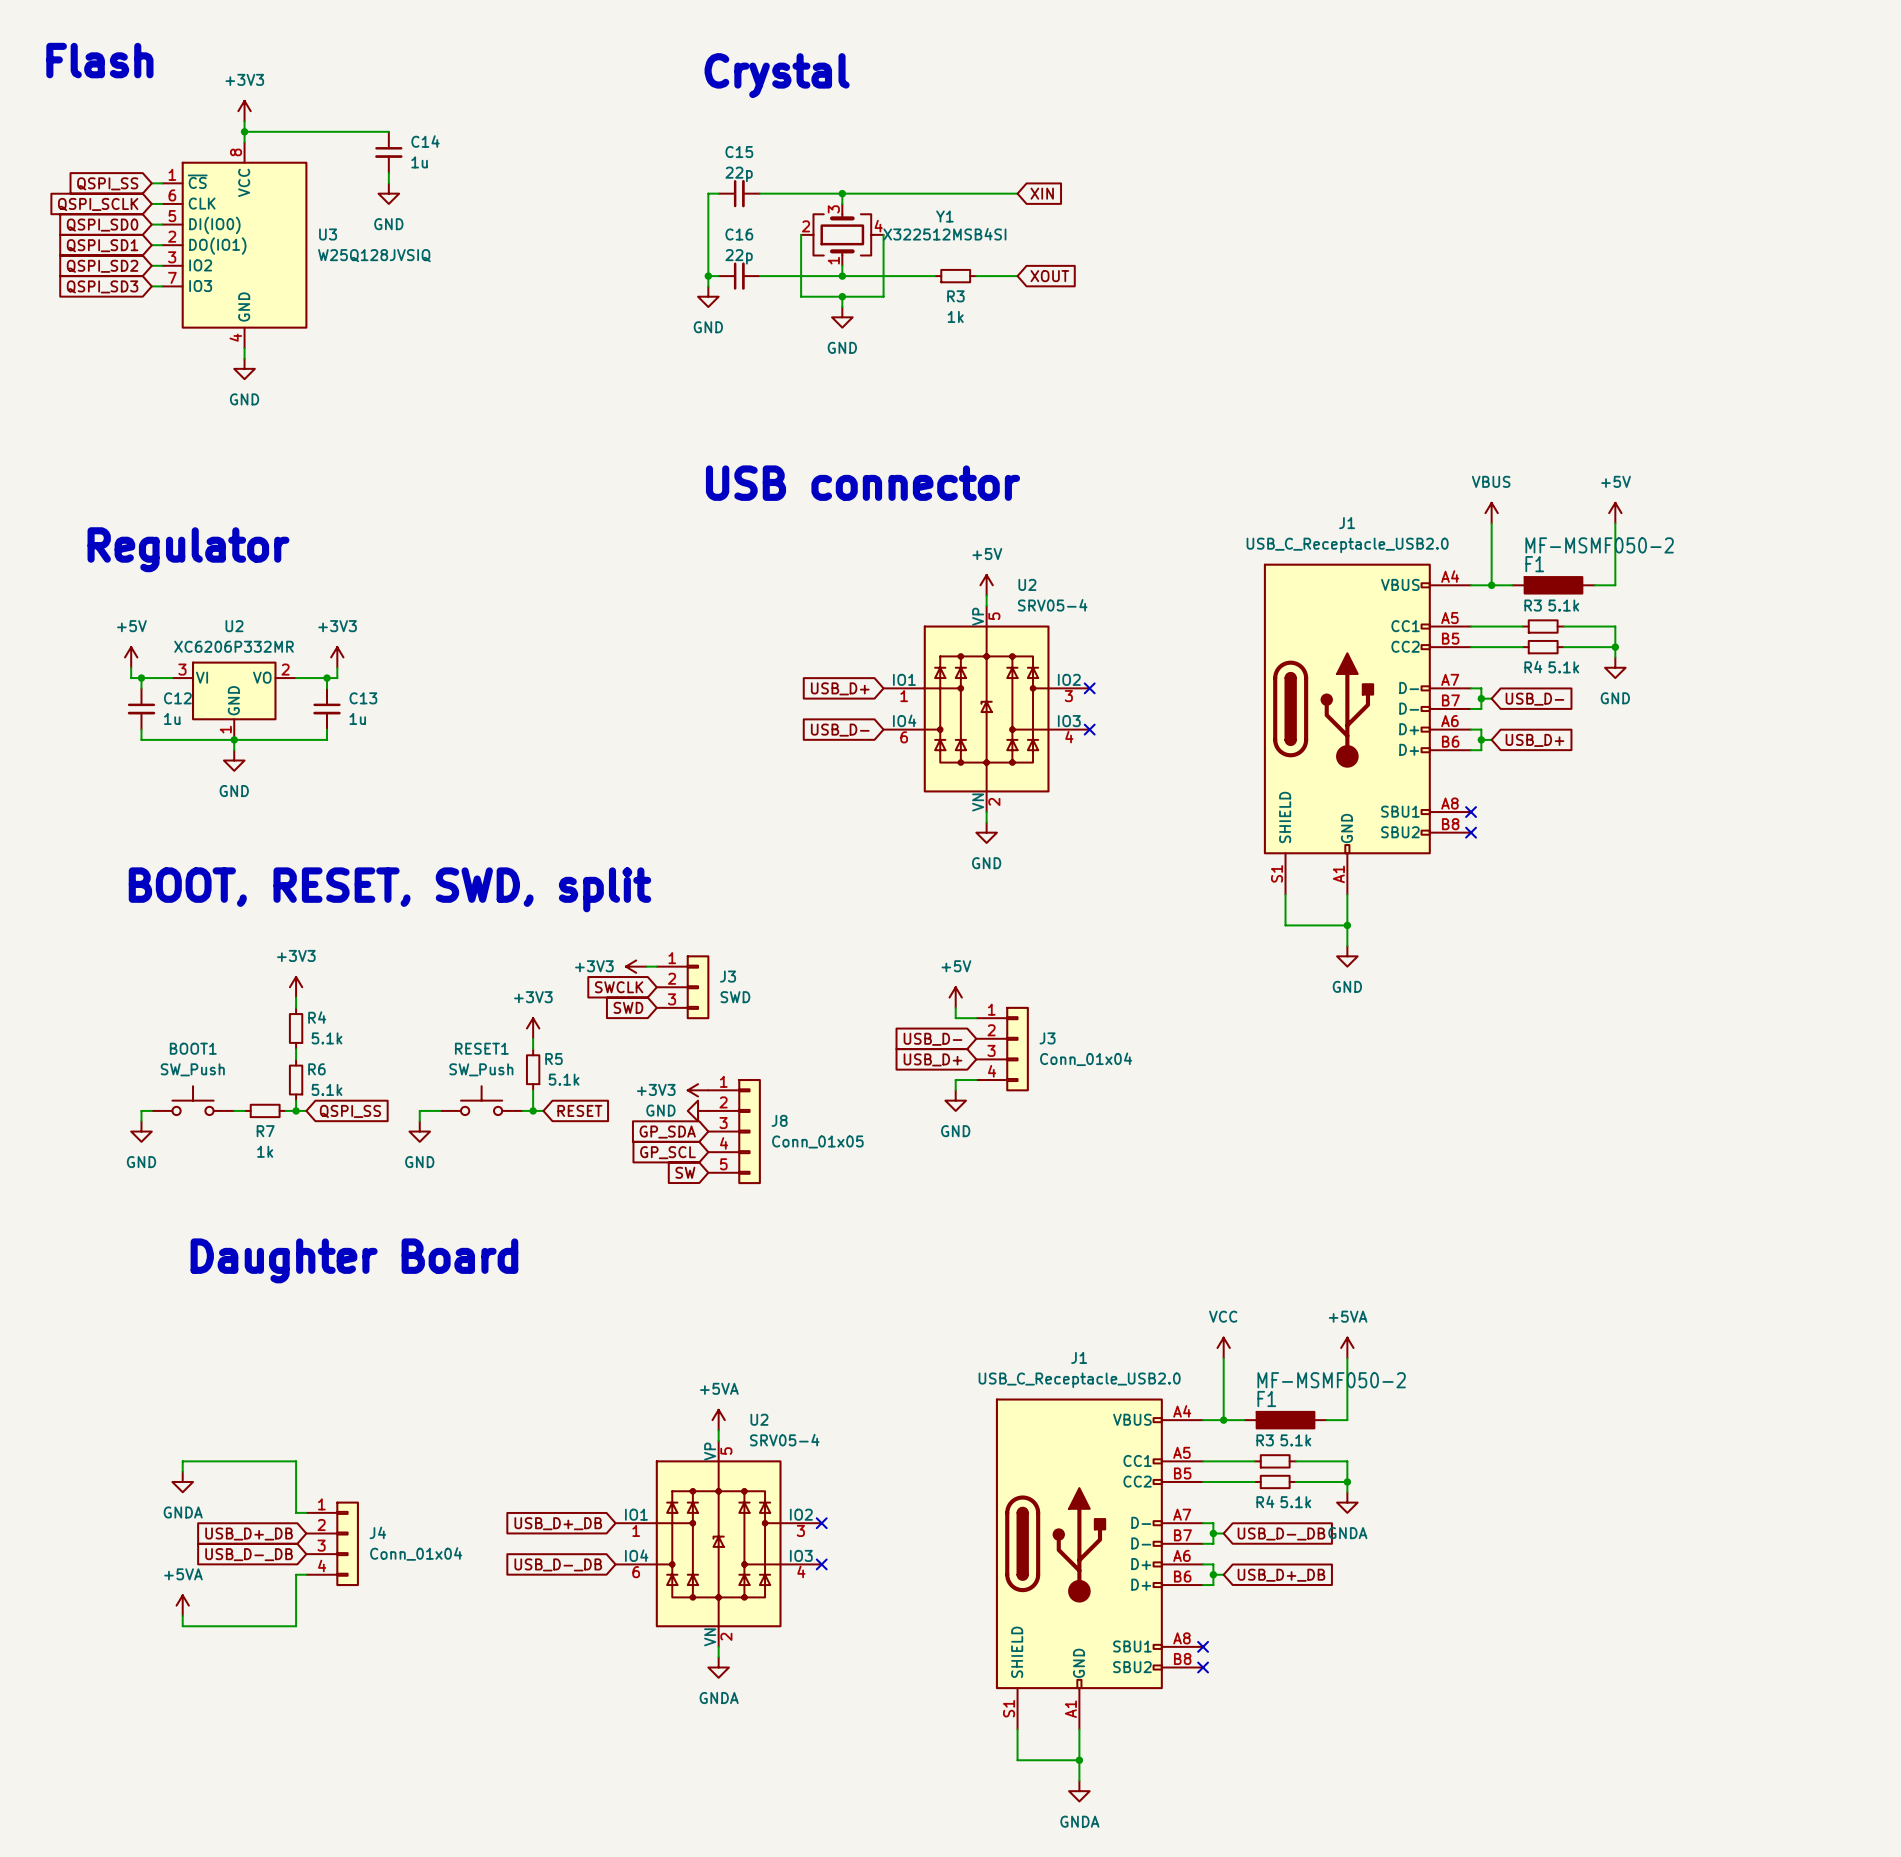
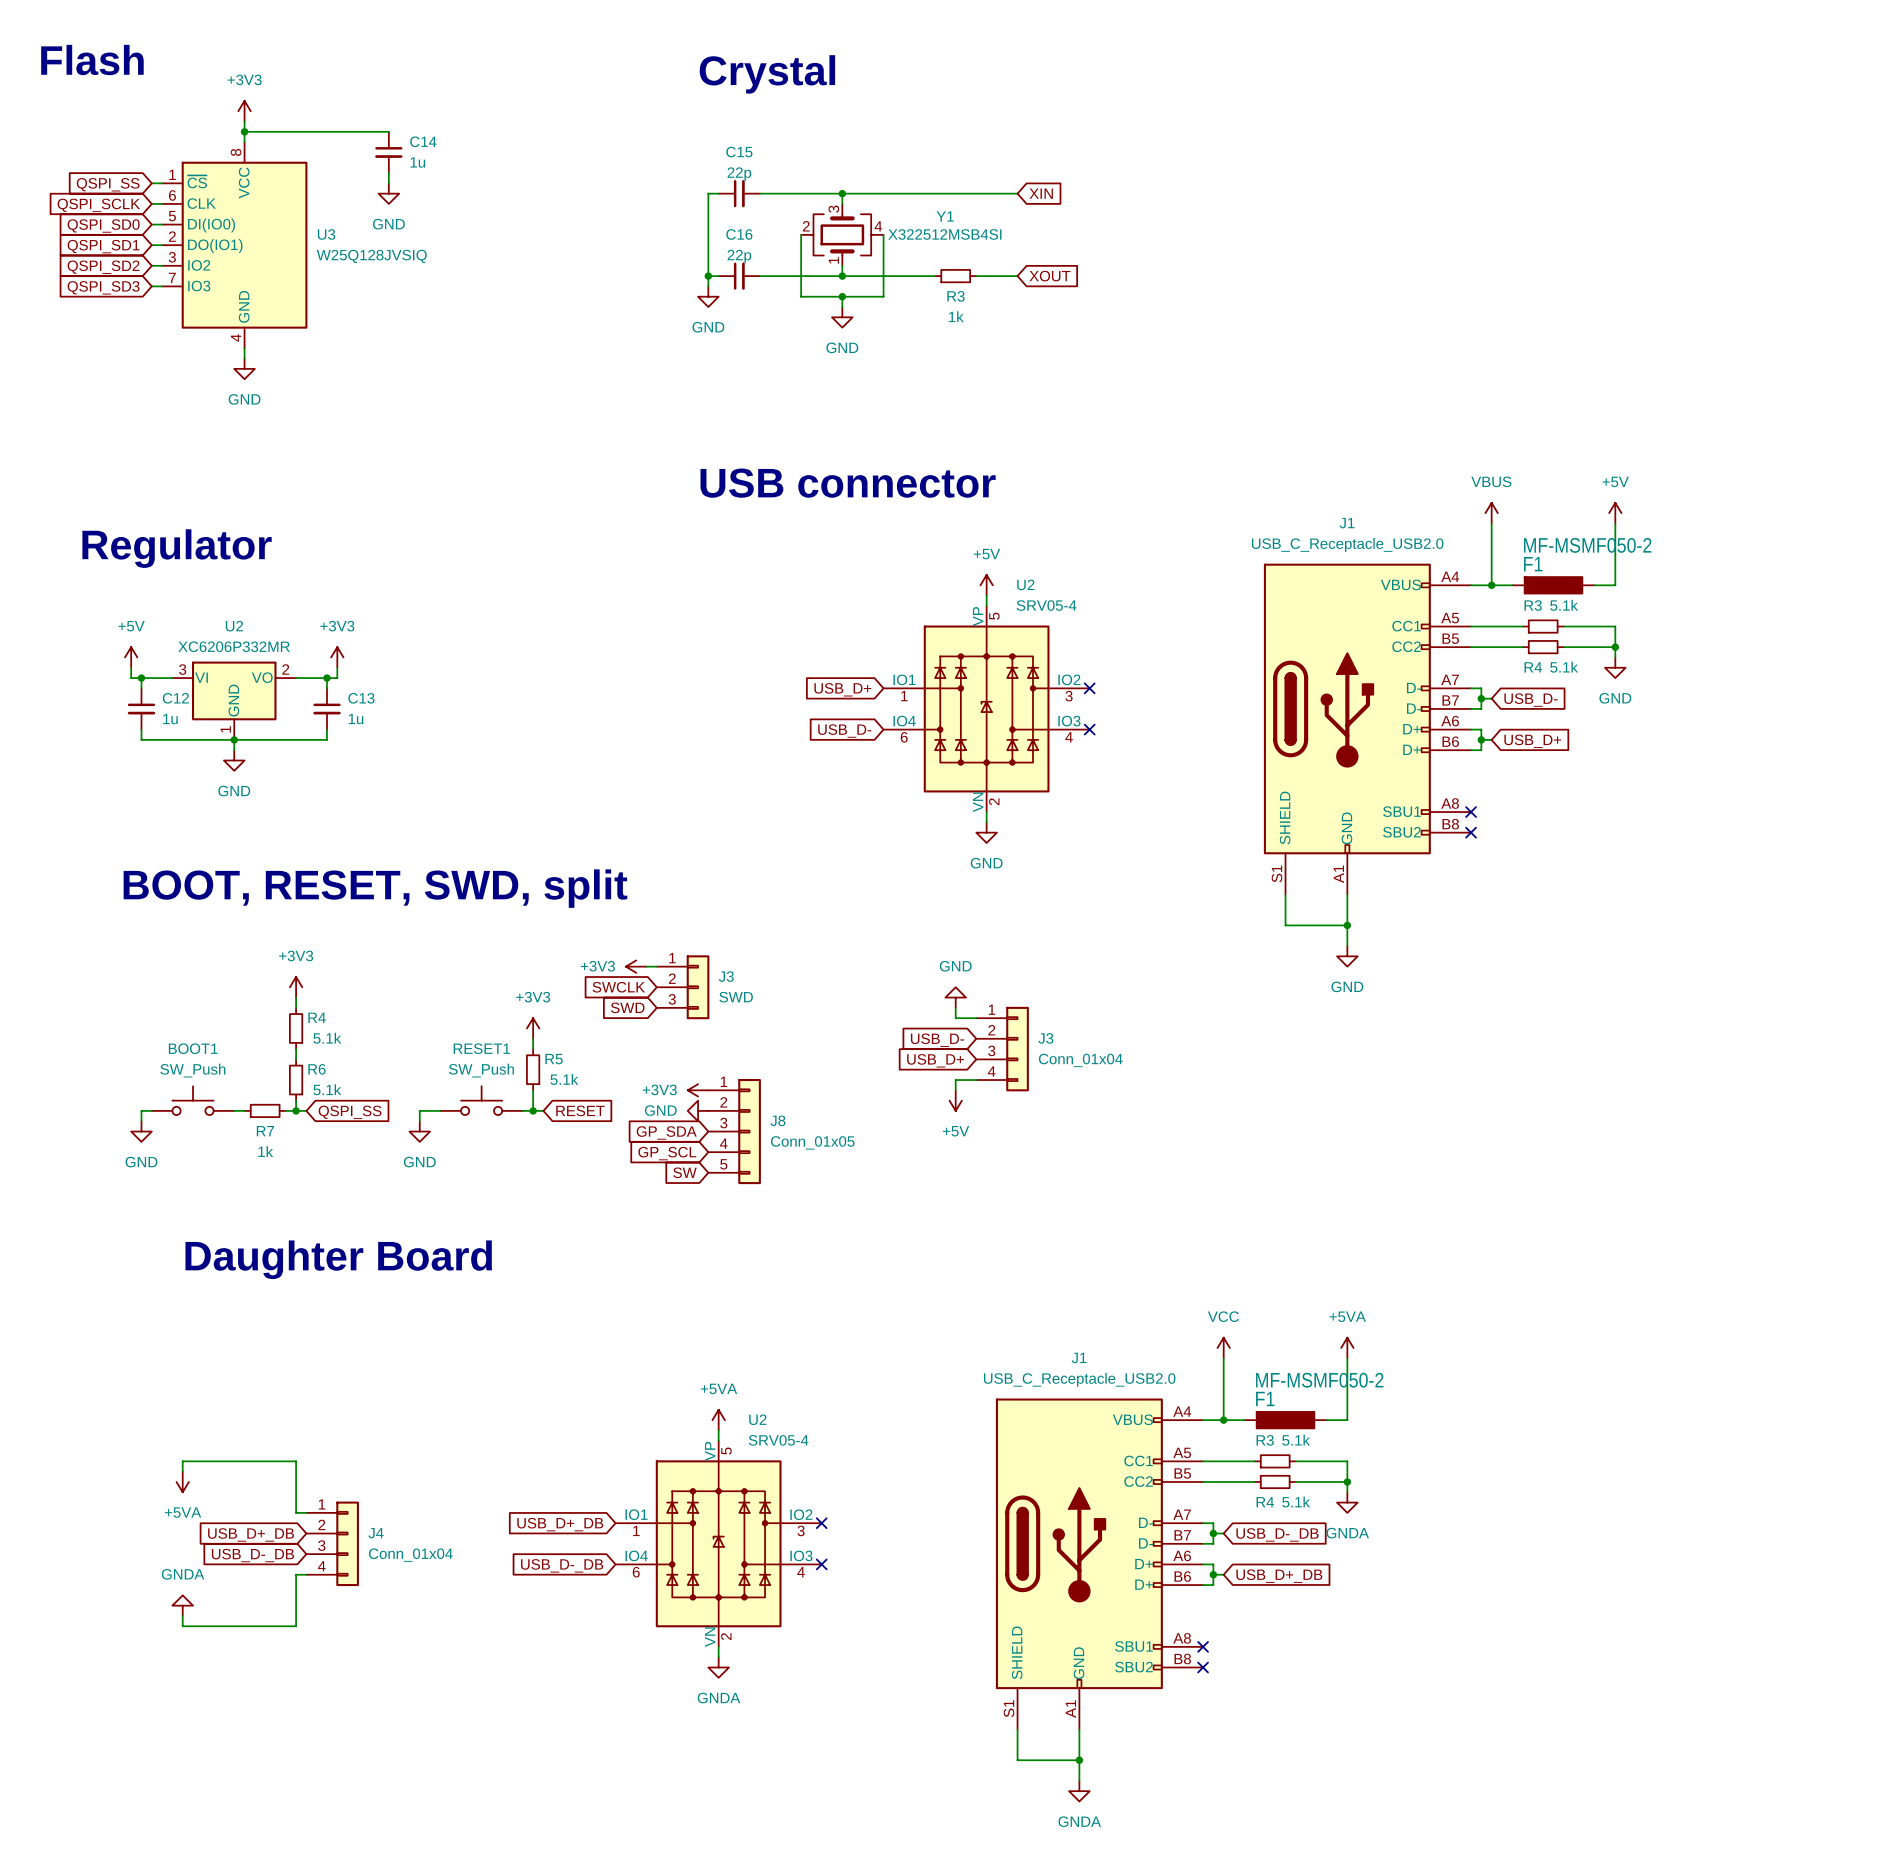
power symbol: +5V (955, 997) -> GND (955, 997)
power symbol: GND (955, 1100) -> +5V (955, 1100)
power symbol: GNDA (182, 1481) -> +5VA (182, 1481)
power symbol: +5VA (182, 1605) -> GNDA (182, 1605)

